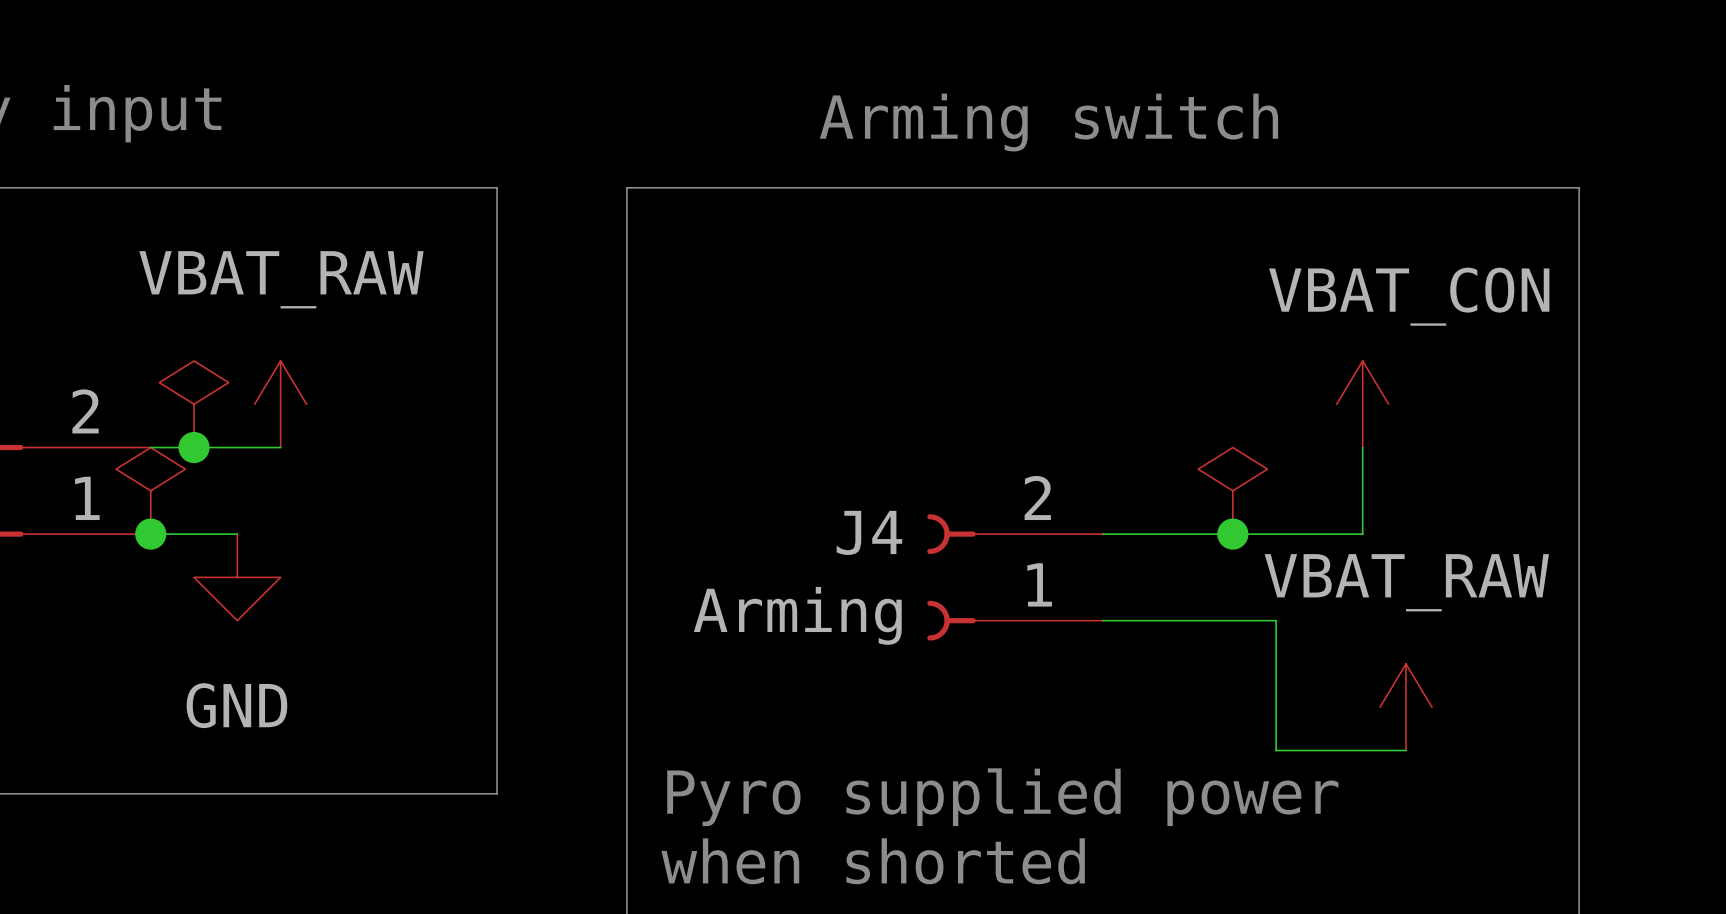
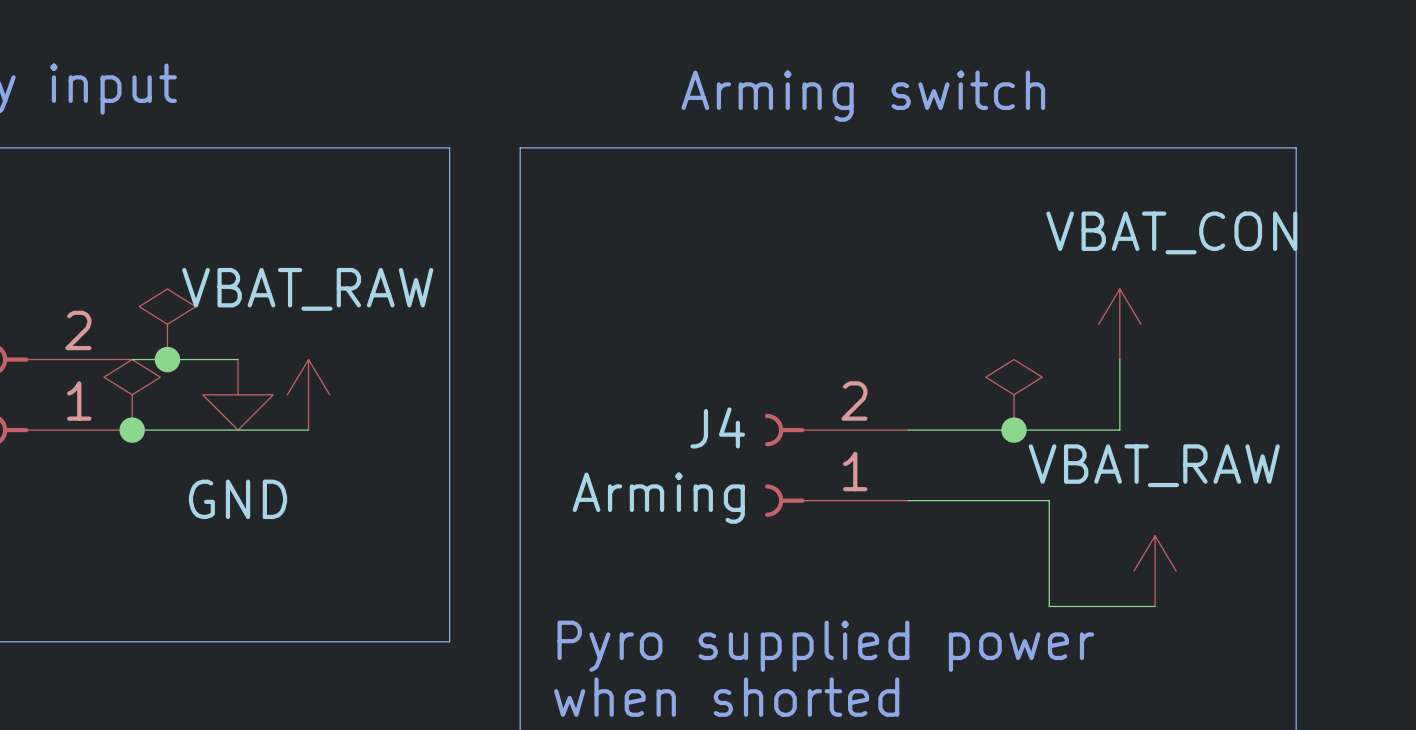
line: (497, 187) (497, 793) -> (414, 147) (449, 147) (449, 641) (414, 641)
power symbol position: VBAT_RAW (280, 404) -> VBAT_RAW (308, 394)
wire: none -> (202, 430) (308, 430)
power symbol position: GND (237, 577) -> GND (238, 394)

